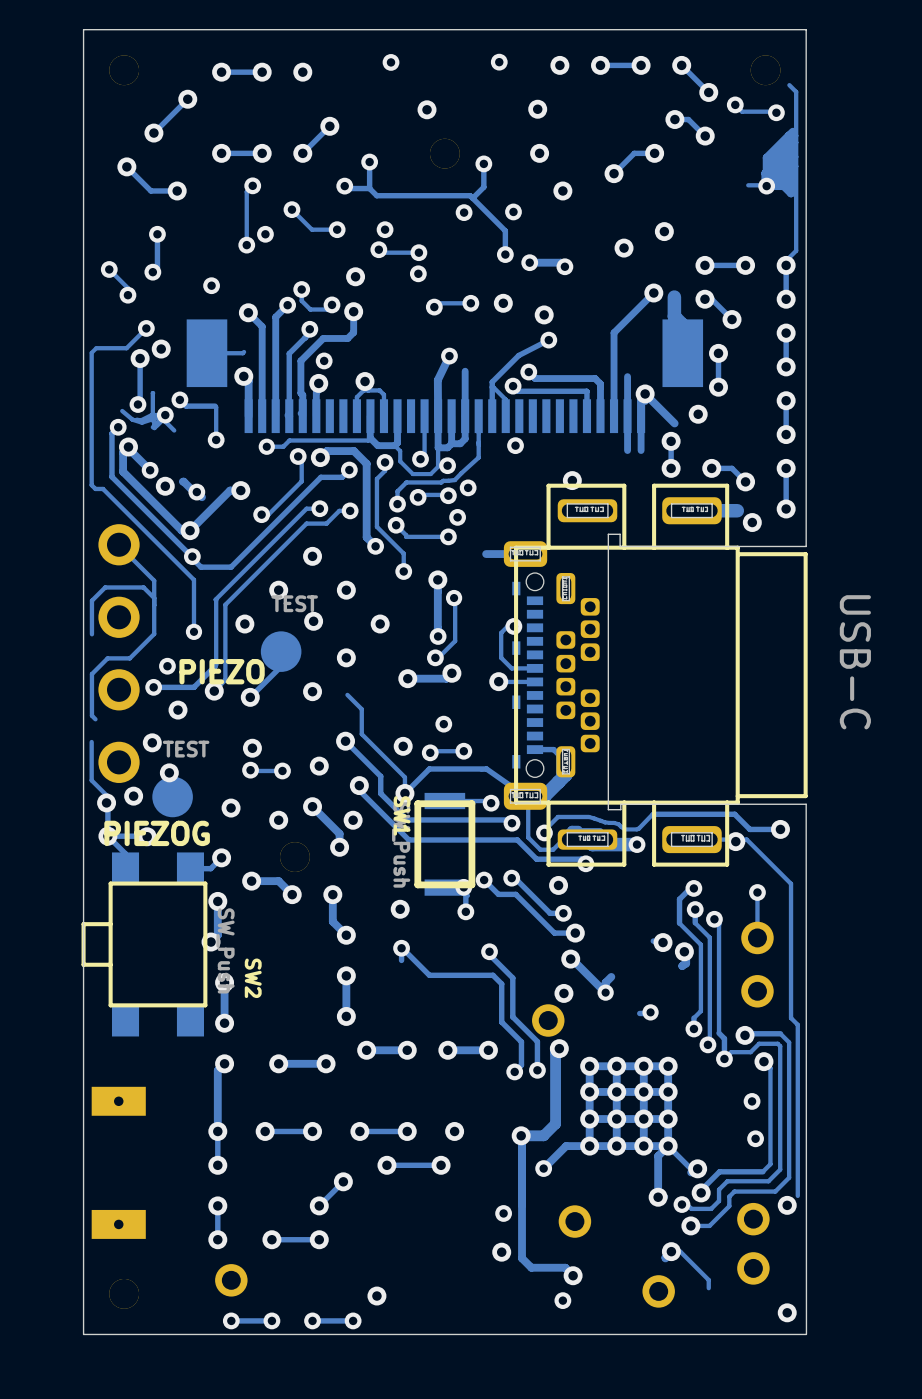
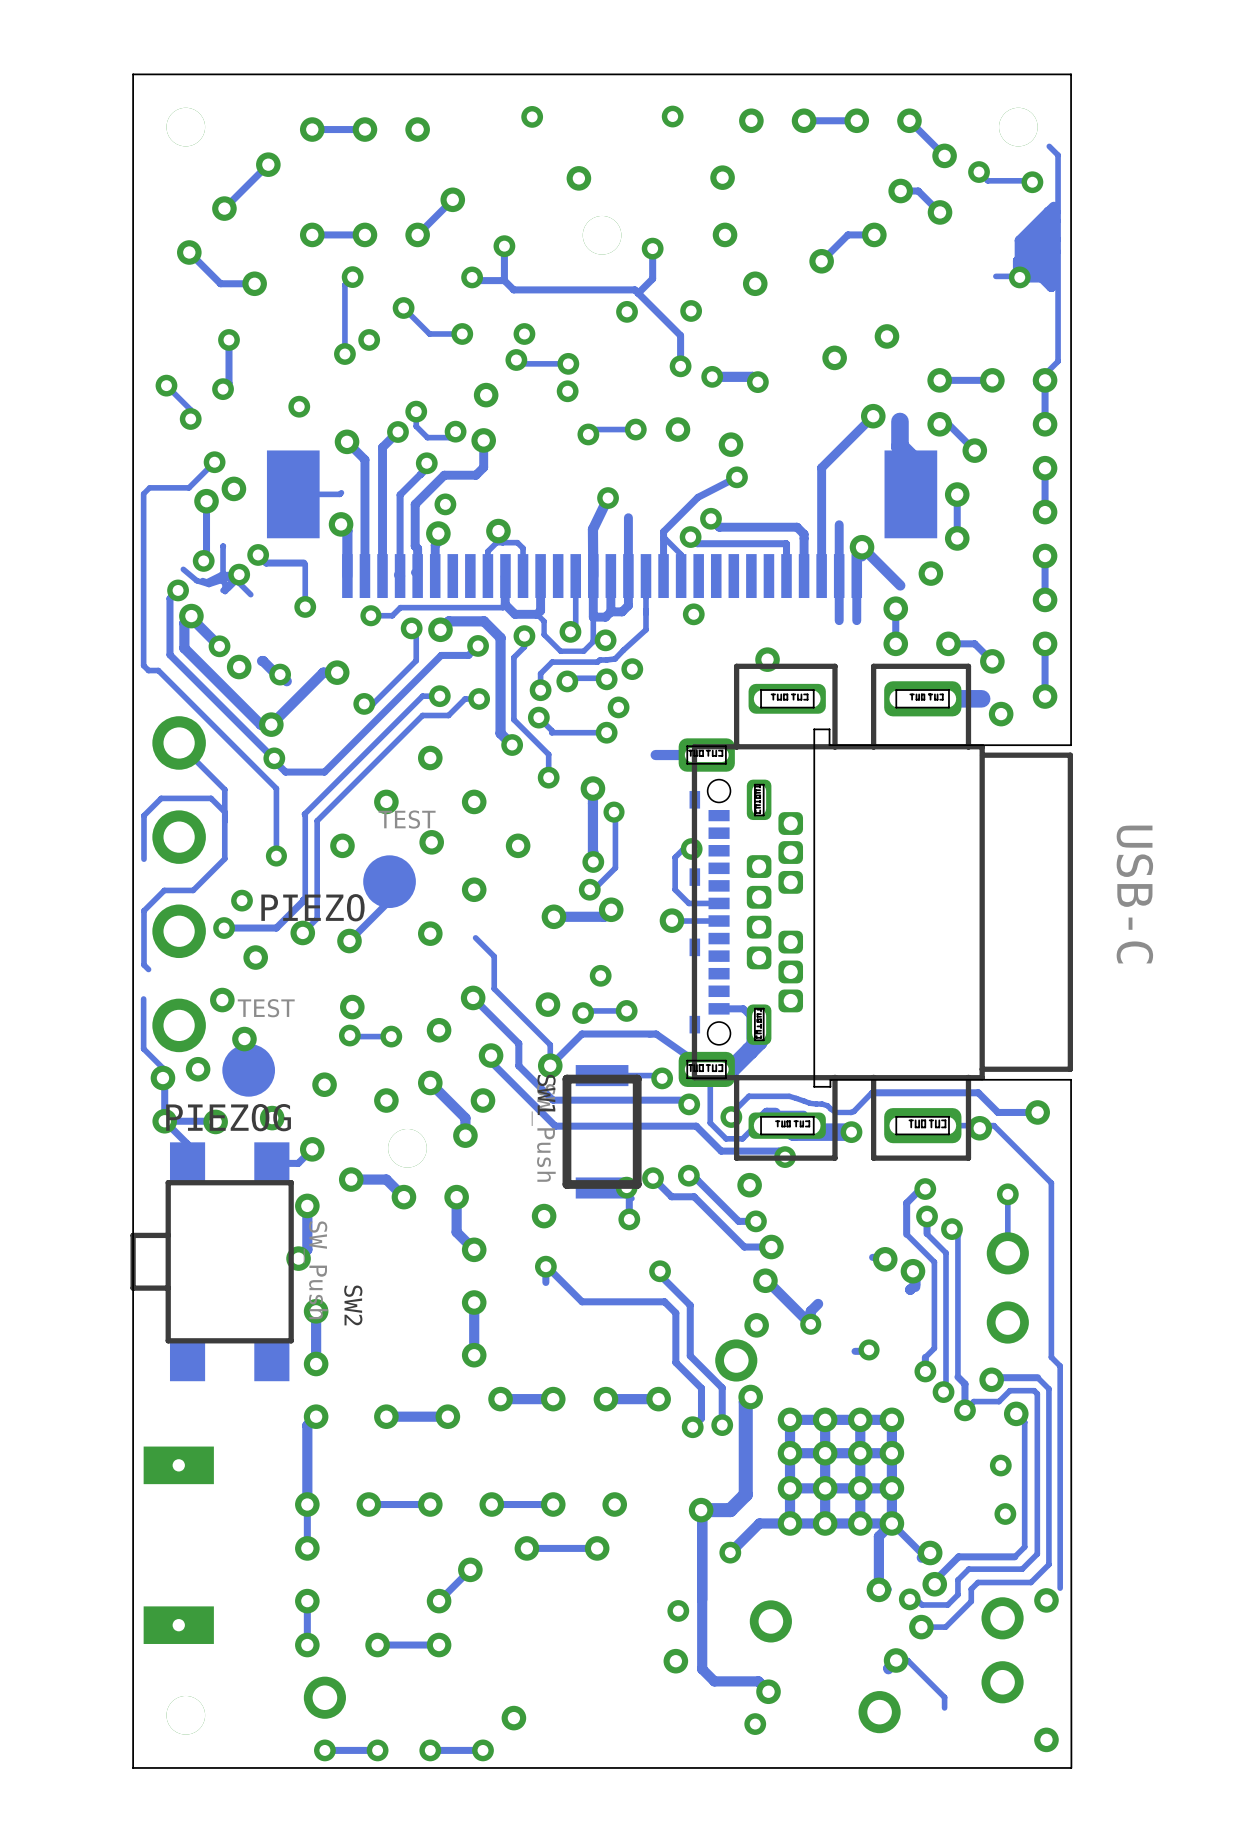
via: none -> (272, 1118)

